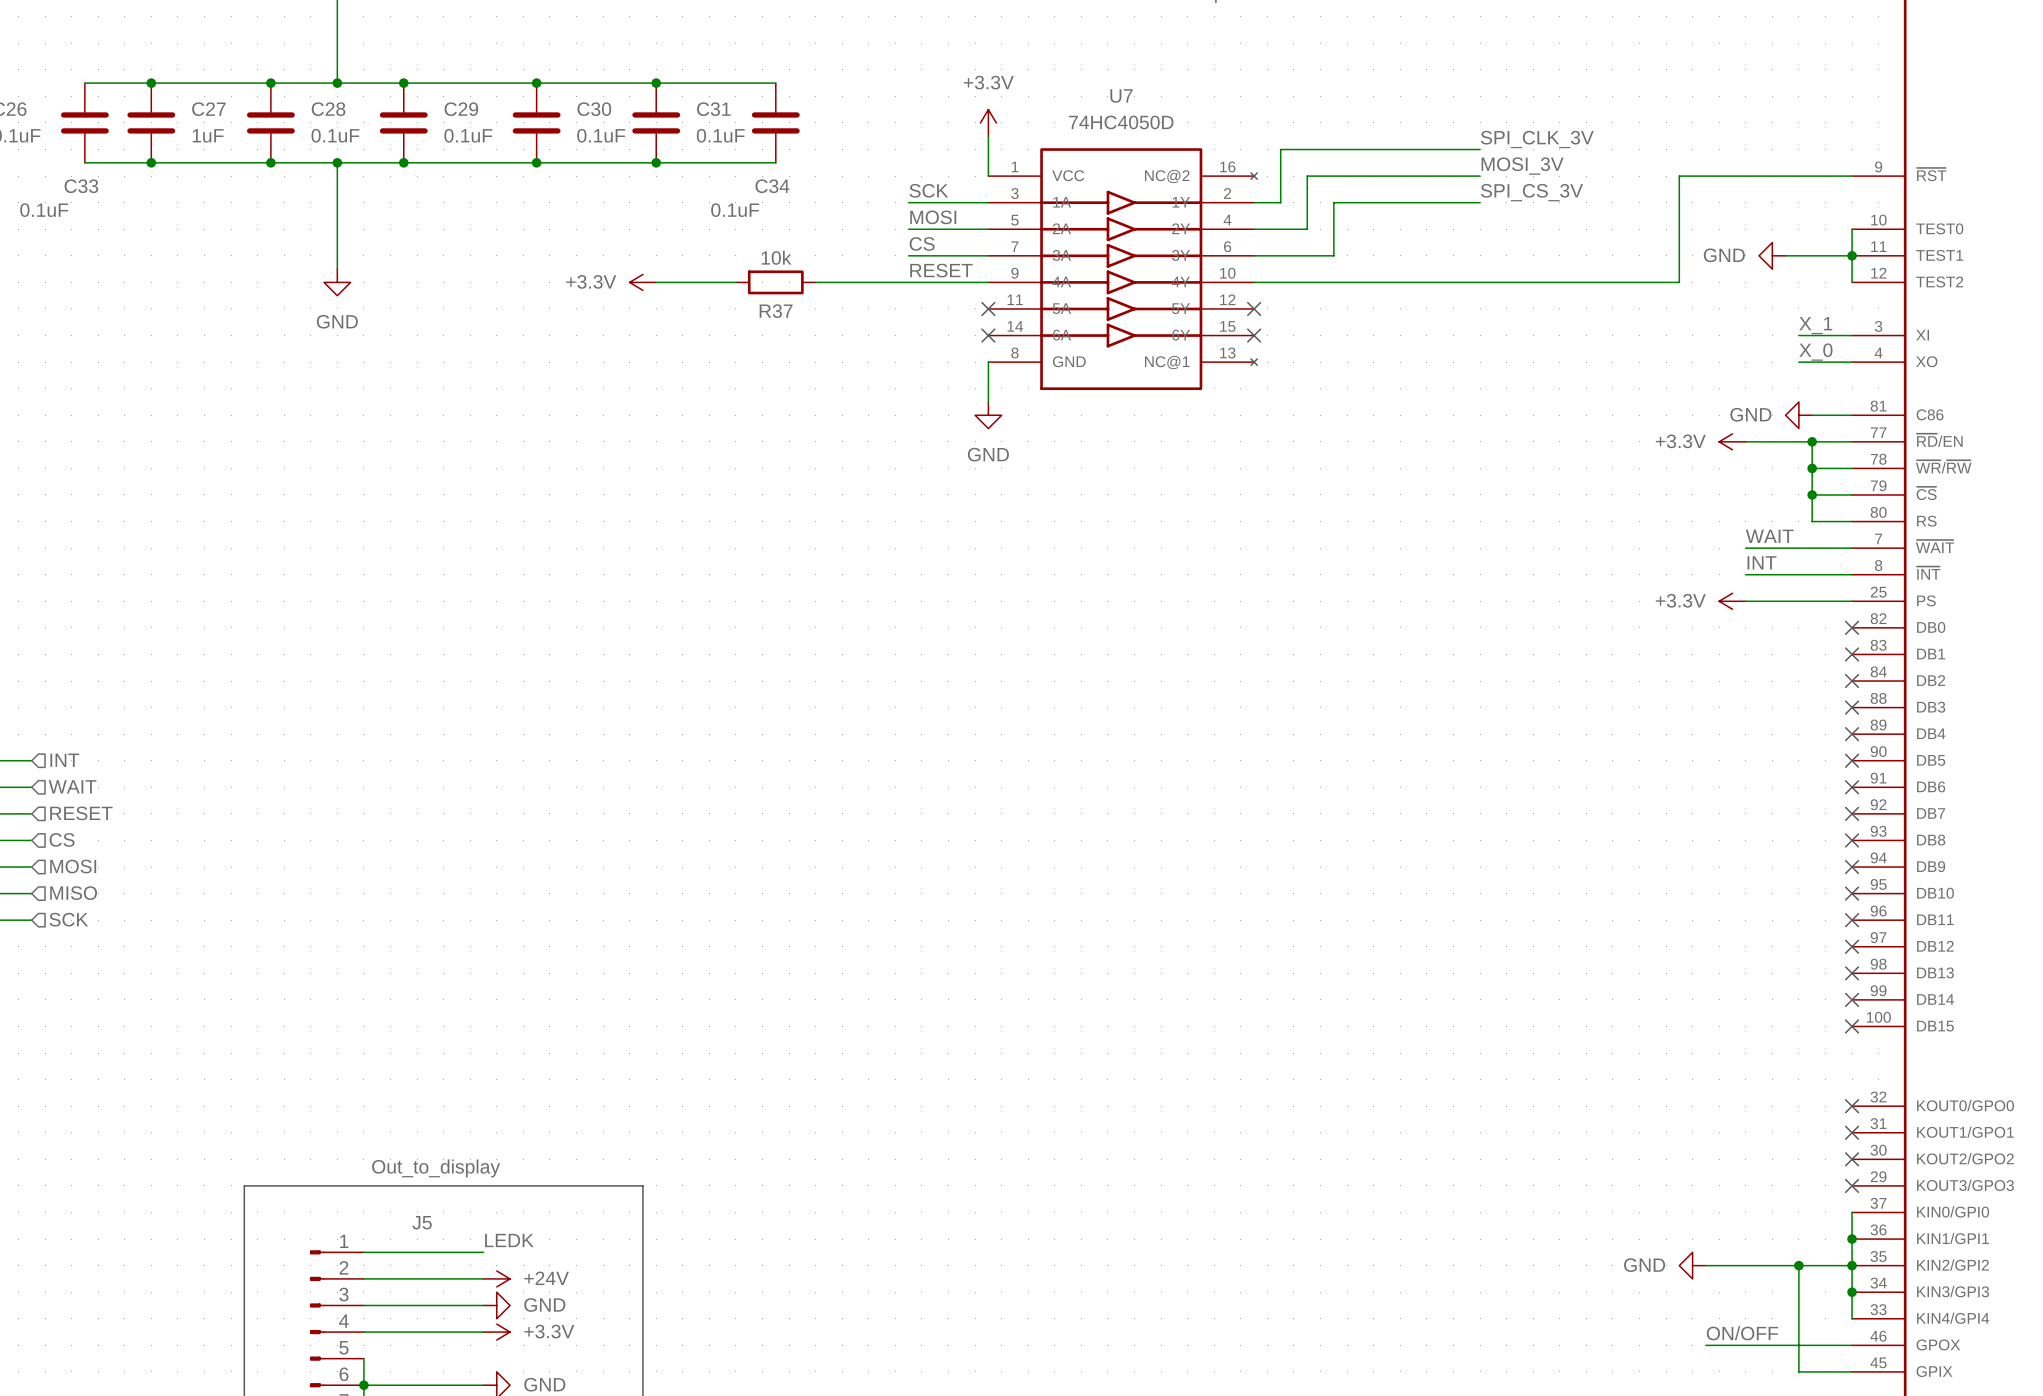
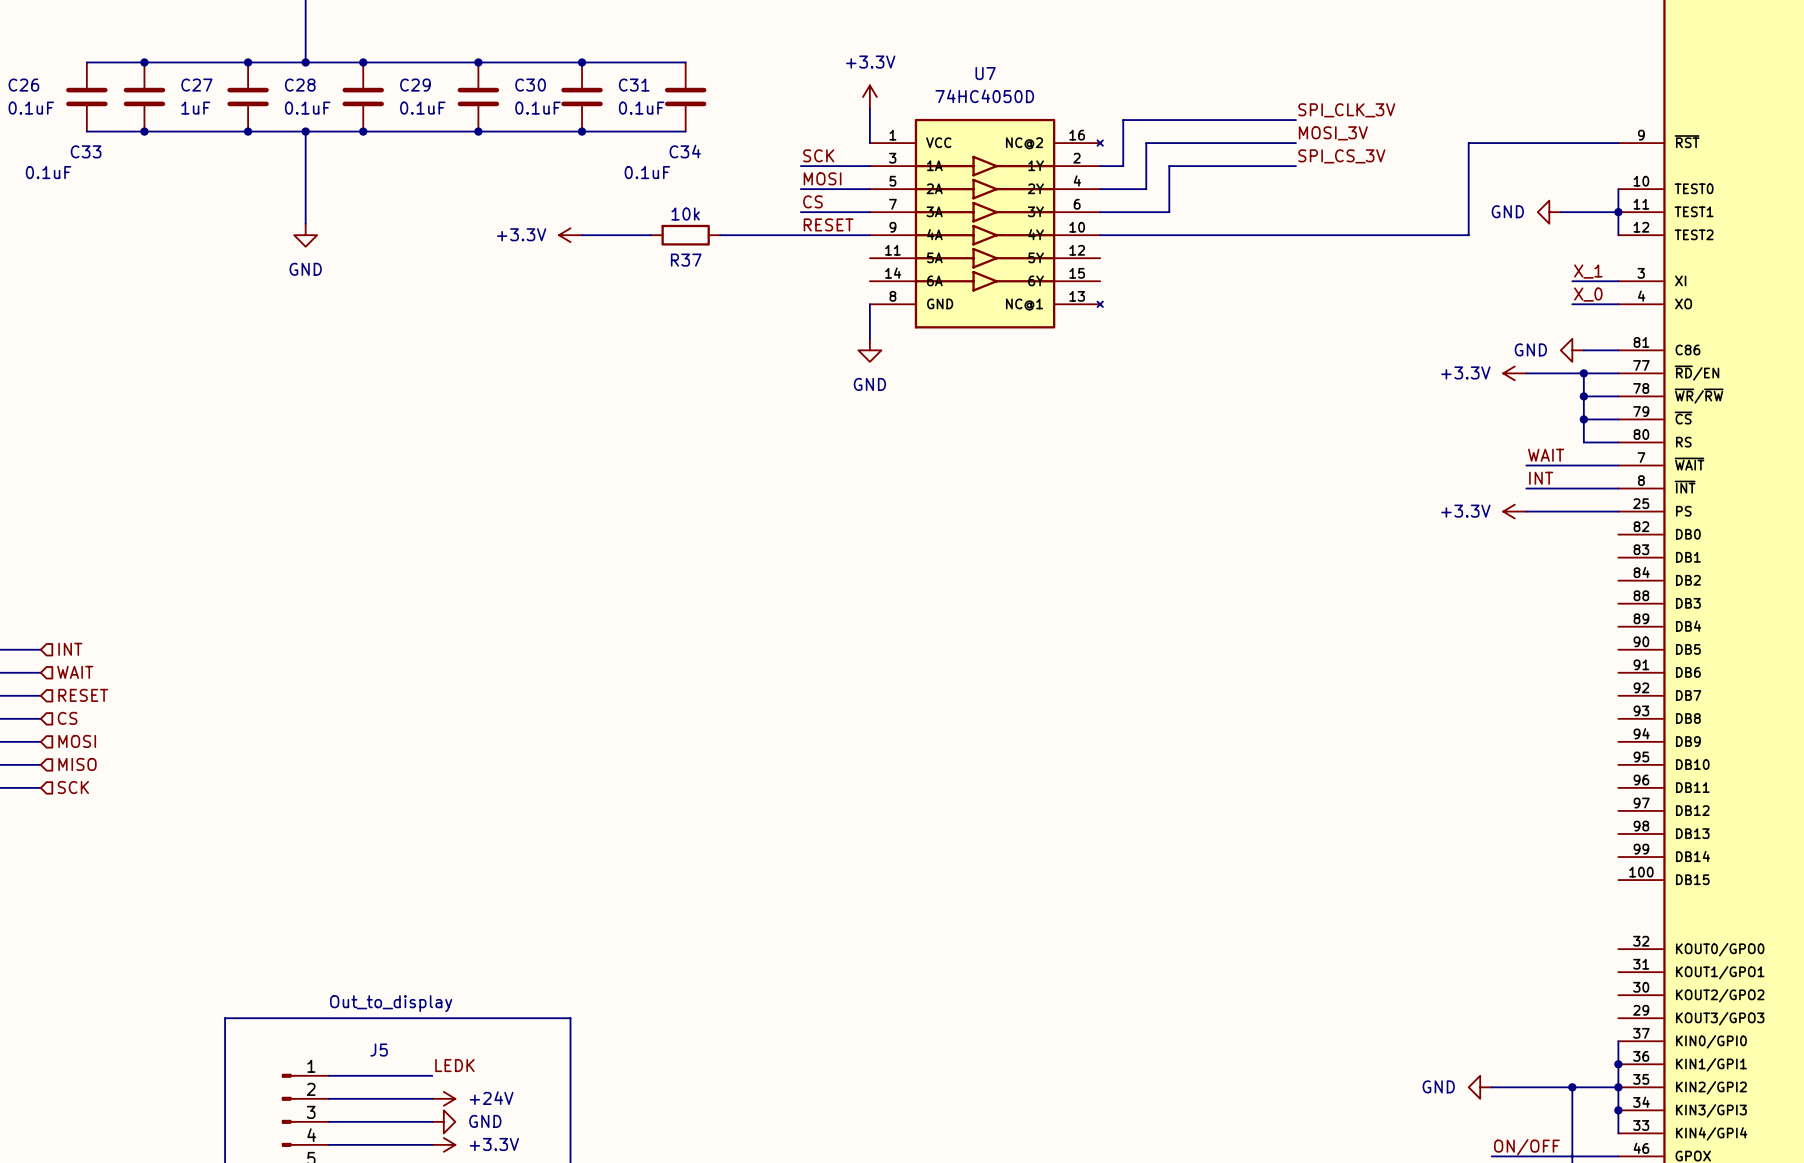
no-connect mark: (988, 308) -> none
no-connect mark: (1254, 308) -> none
no-connect mark: (988, 335) -> none
no-connect mark: (1254, 335) -> none
no-connect mark: (1852, 627) -> none
no-connect mark: (1852, 654) -> none
no-connect mark: (1852, 681) -> none
no-connect mark: (1852, 707) -> none
no-connect mark: (1852, 734) -> none
no-connect mark: (1852, 760) -> none
no-connect mark: (1852, 787) -> none
no-connect mark: (1852, 813) -> none
no-connect mark: (1852, 840) -> none
no-connect mark: (1852, 867) -> none
no-connect mark: (1852, 893) -> none
no-connect mark: (1852, 920) -> none
no-connect mark: (1852, 946) -> none
no-connect mark: (1852, 973) -> none
no-connect mark: (1852, 999) -> none
no-connect mark: (1852, 1026) -> none
no-connect mark: (1852, 1106) -> none
no-connect mark: (1852, 1132) -> none
no-connect mark: (1852, 1159) -> none
no-connect mark: (1852, 1185) -> none

